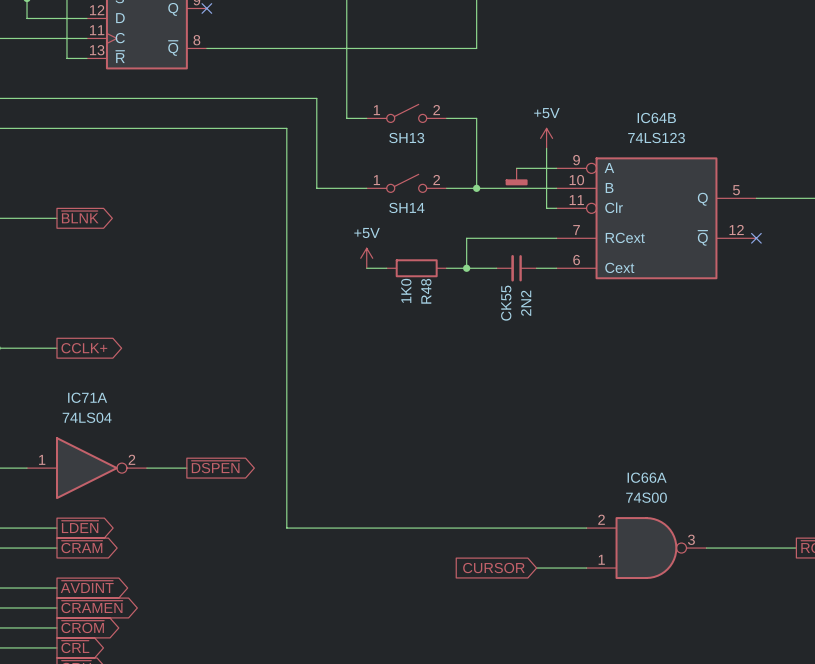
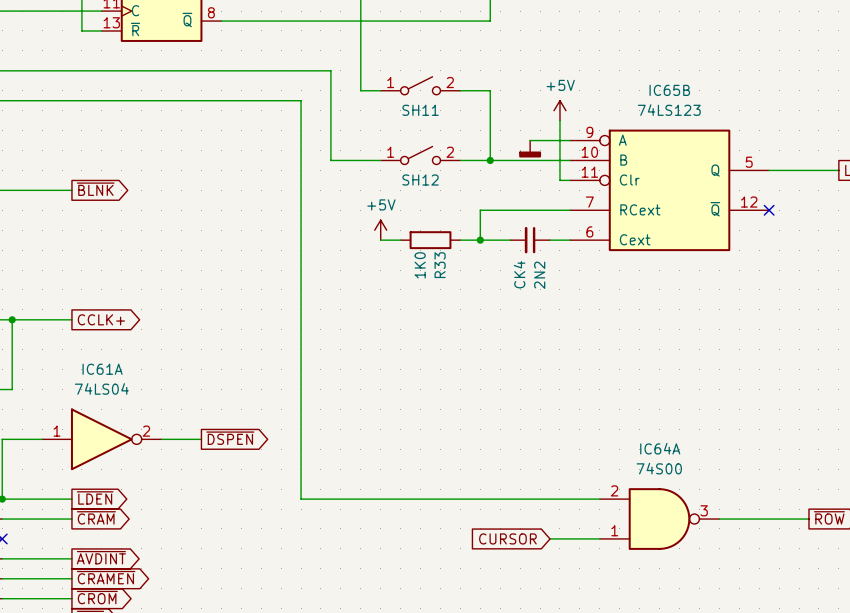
IC64B name: IC64B (656, 118) -> IC65B (669, 90)
SH13 name: SH13 (406, 138) -> SH11 (420, 110)
SH14 name: SH14 (406, 207) -> SH12 (420, 180)
R48 name: R48 (426, 291) -> R33 (440, 265)
CK55 name: CK55 (506, 303) -> CK4 (519, 274)
IC71A name: IC71A (87, 397) -> IC61A (102, 369)
IC66A name: IC66A (647, 477) -> IC64A (660, 448)

